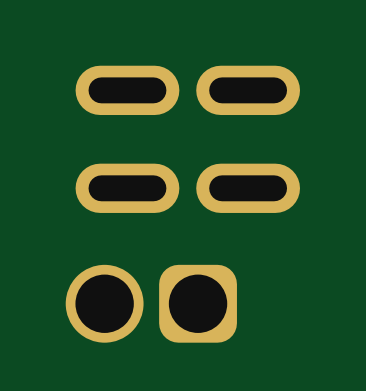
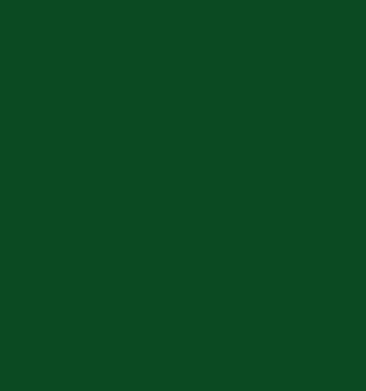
part: (187, 90) -> none
part: (187, 188) -> none
part: (151, 303) -> none

